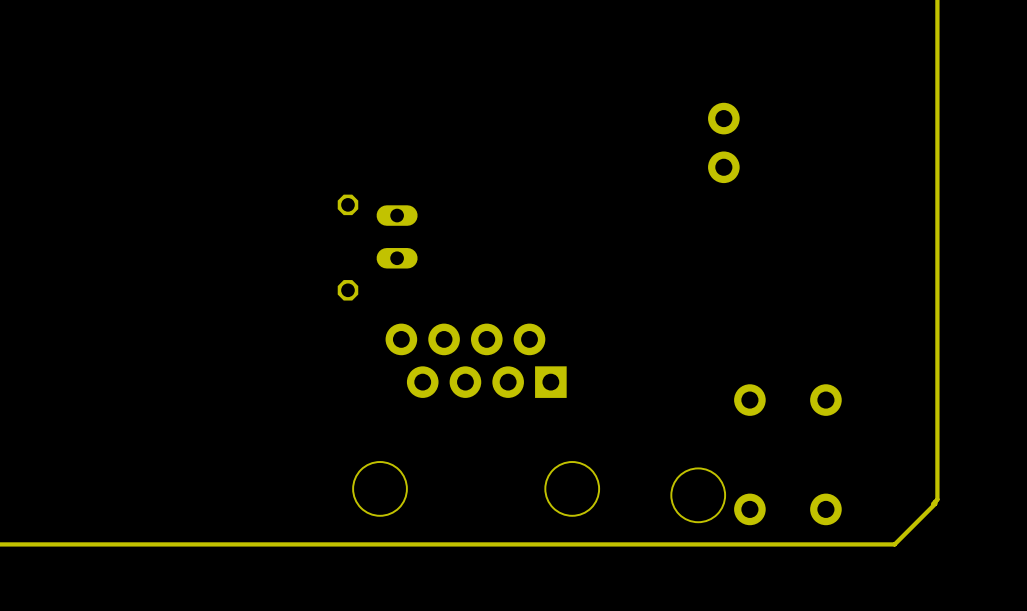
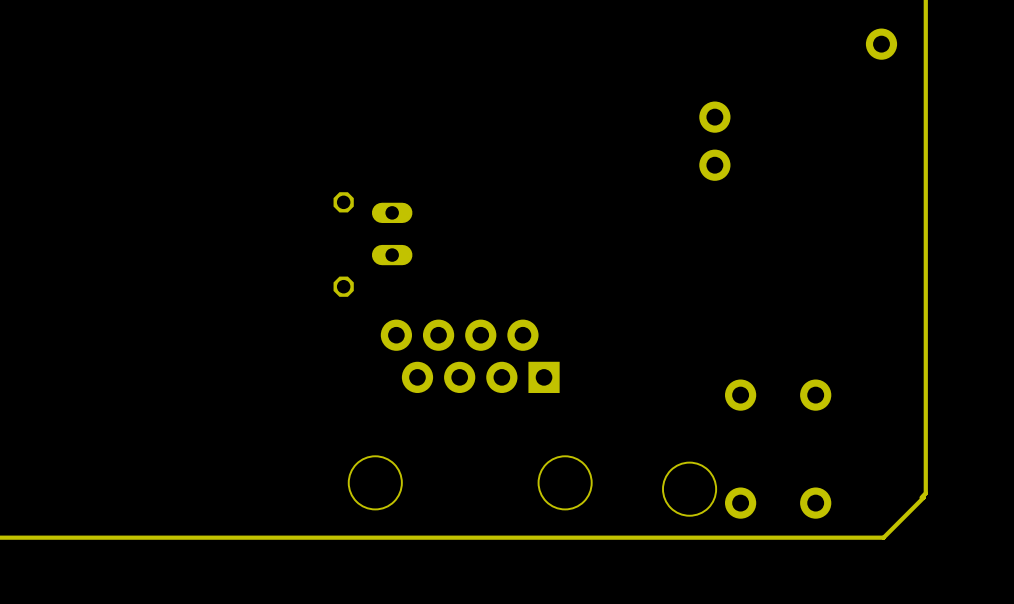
part: none -> (881, 44)

